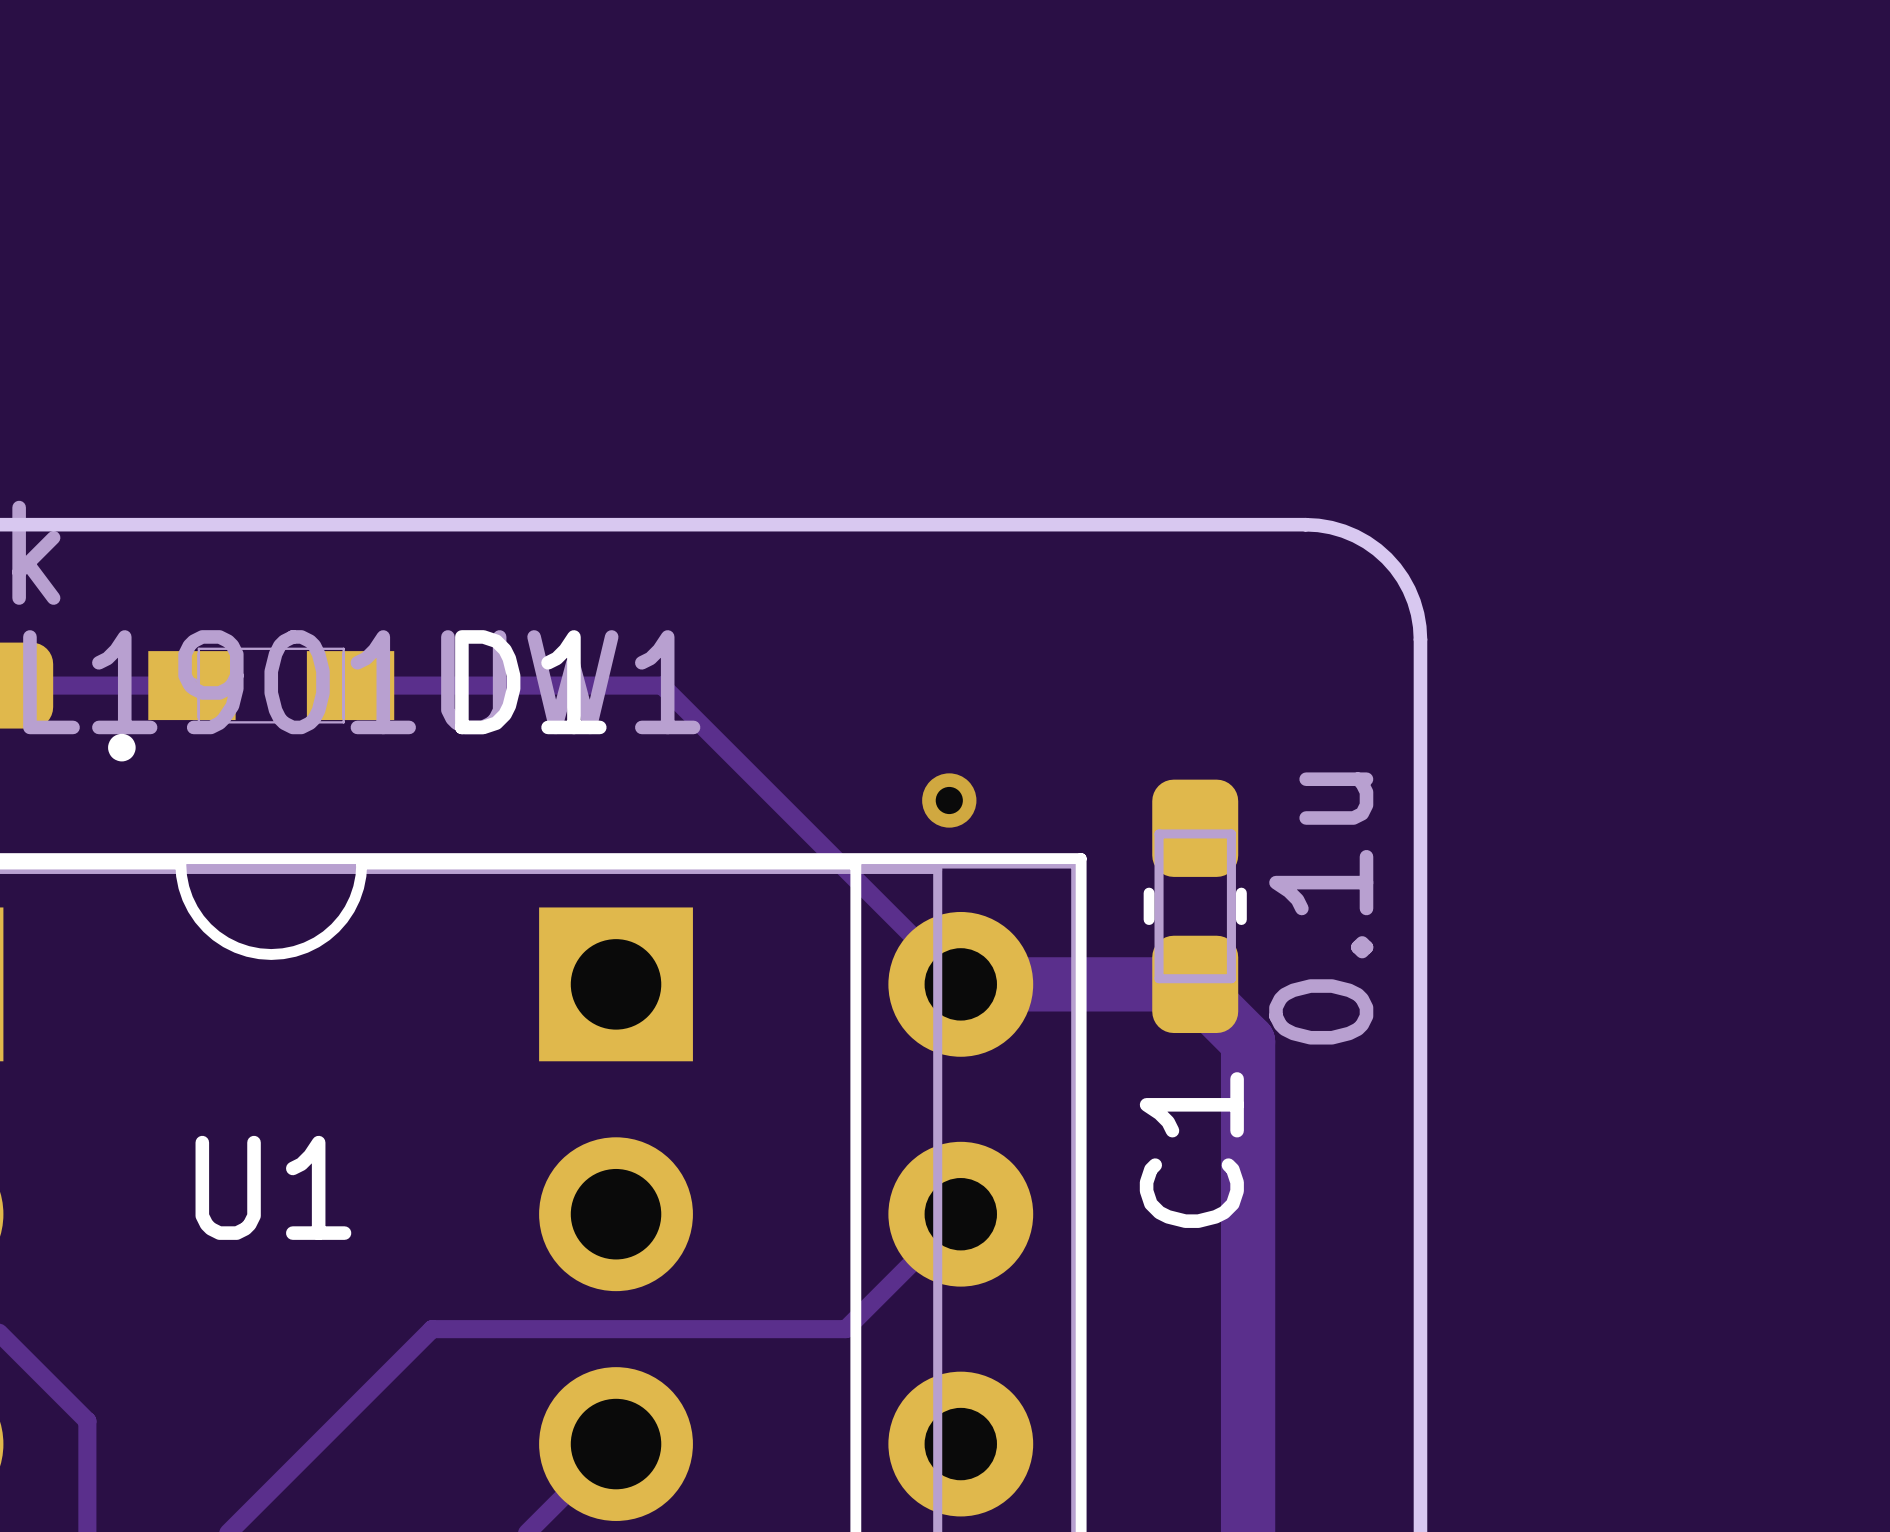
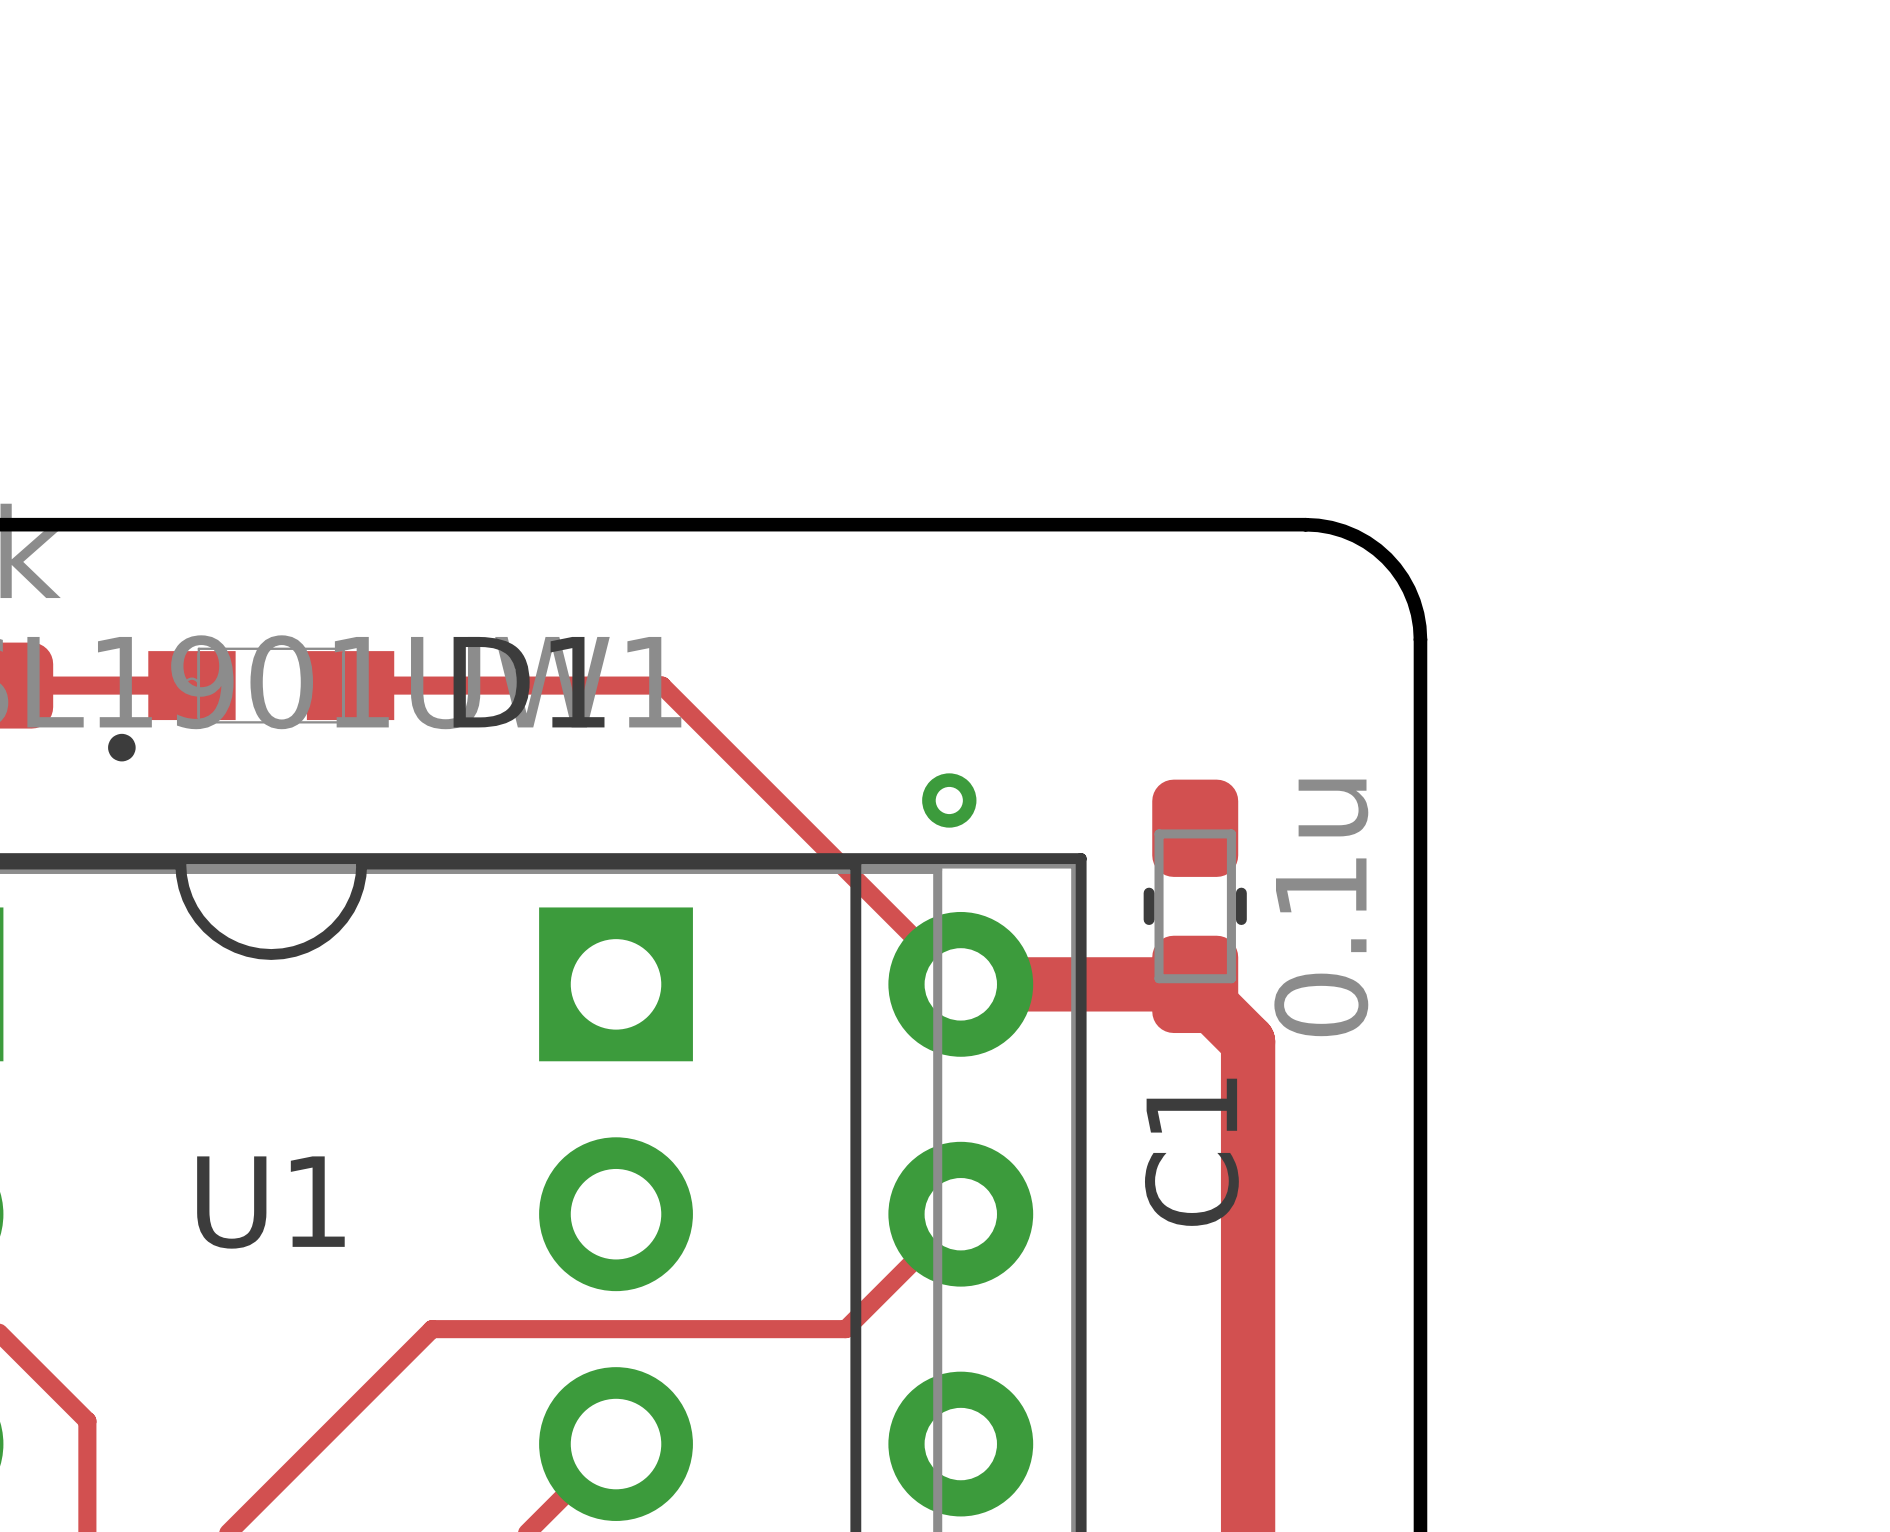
U1 name position: U1 (273, 1187) -> U1 (270, 1202)

